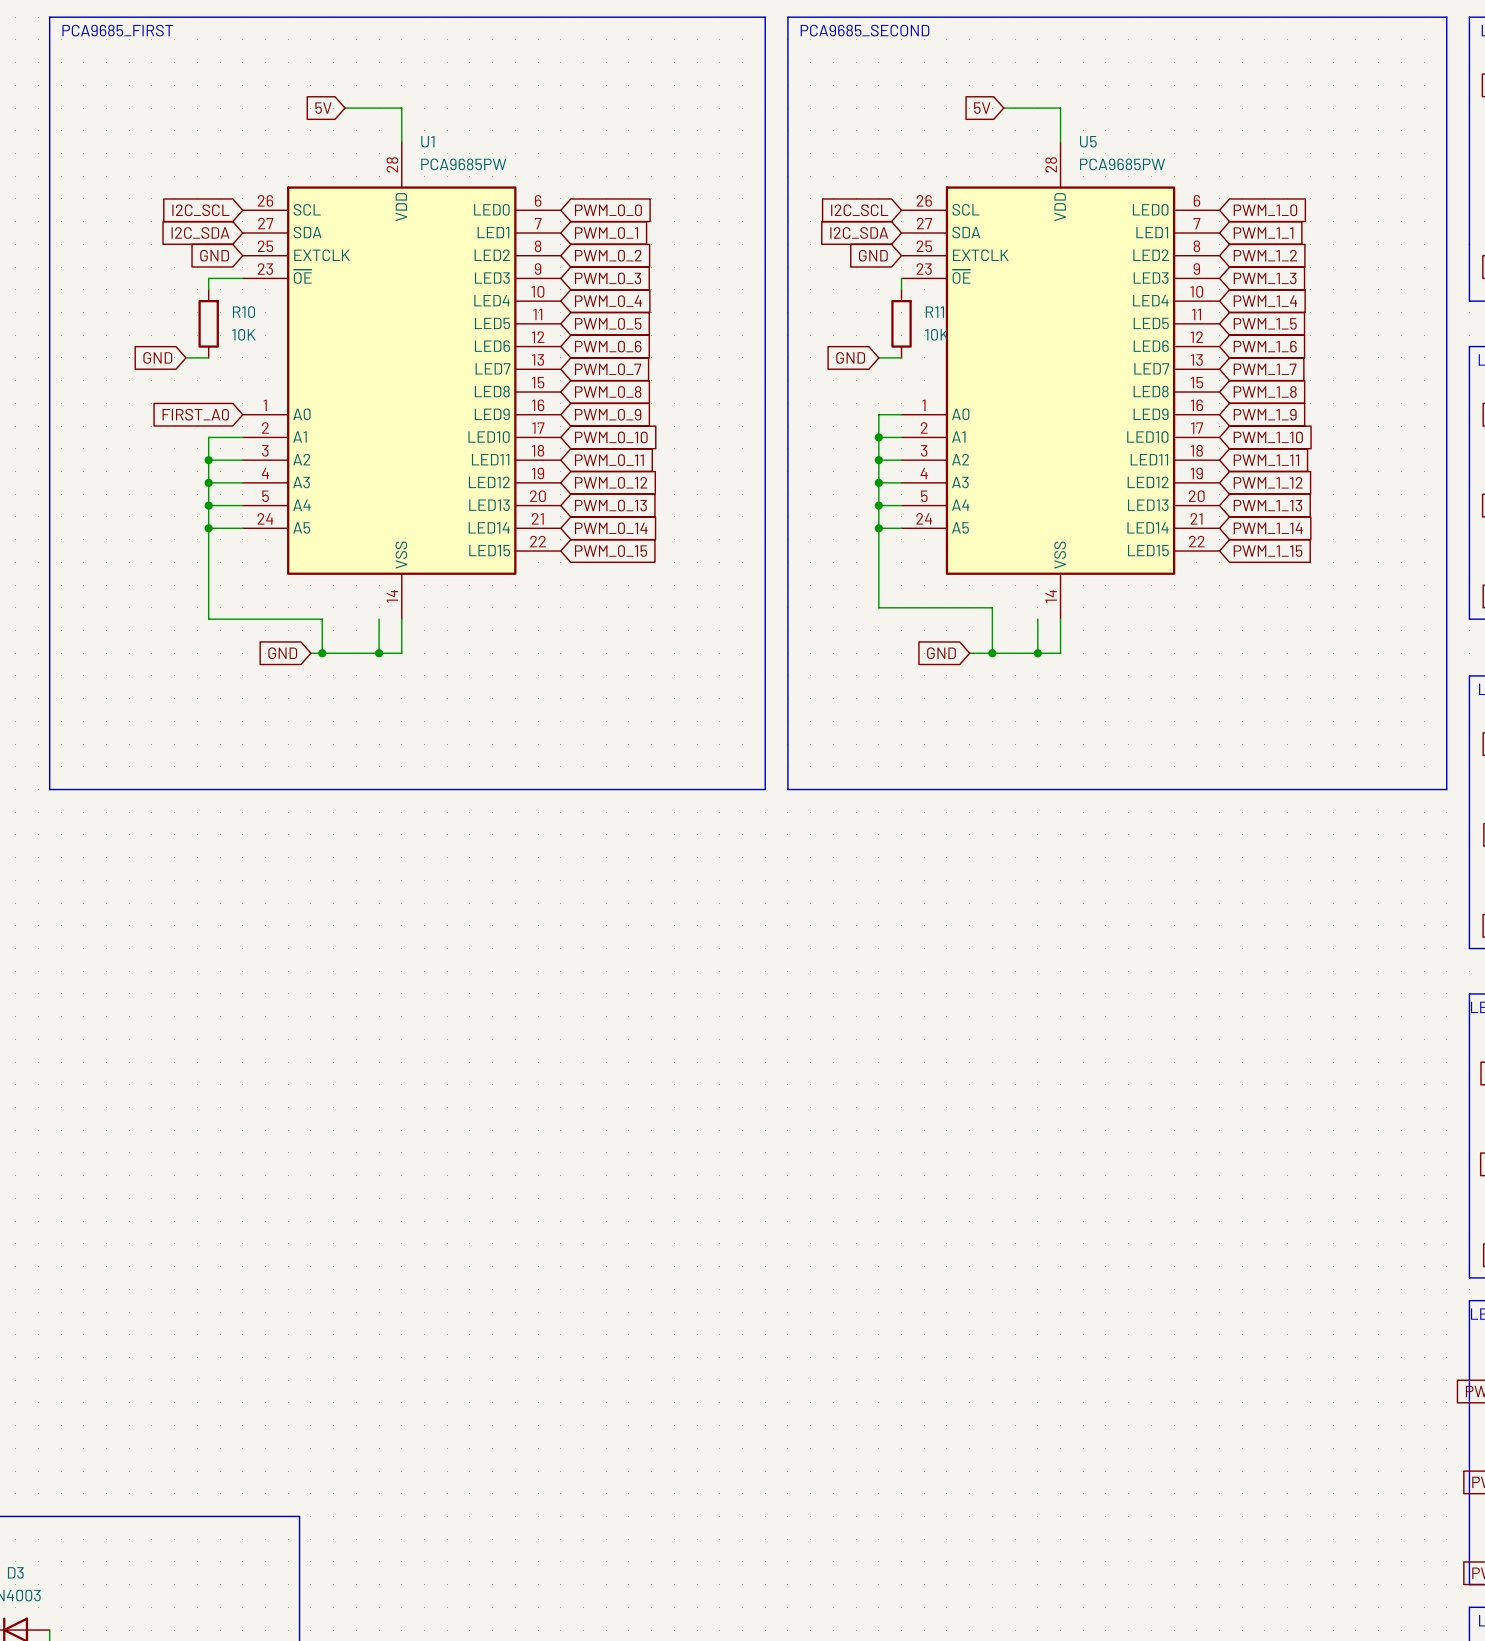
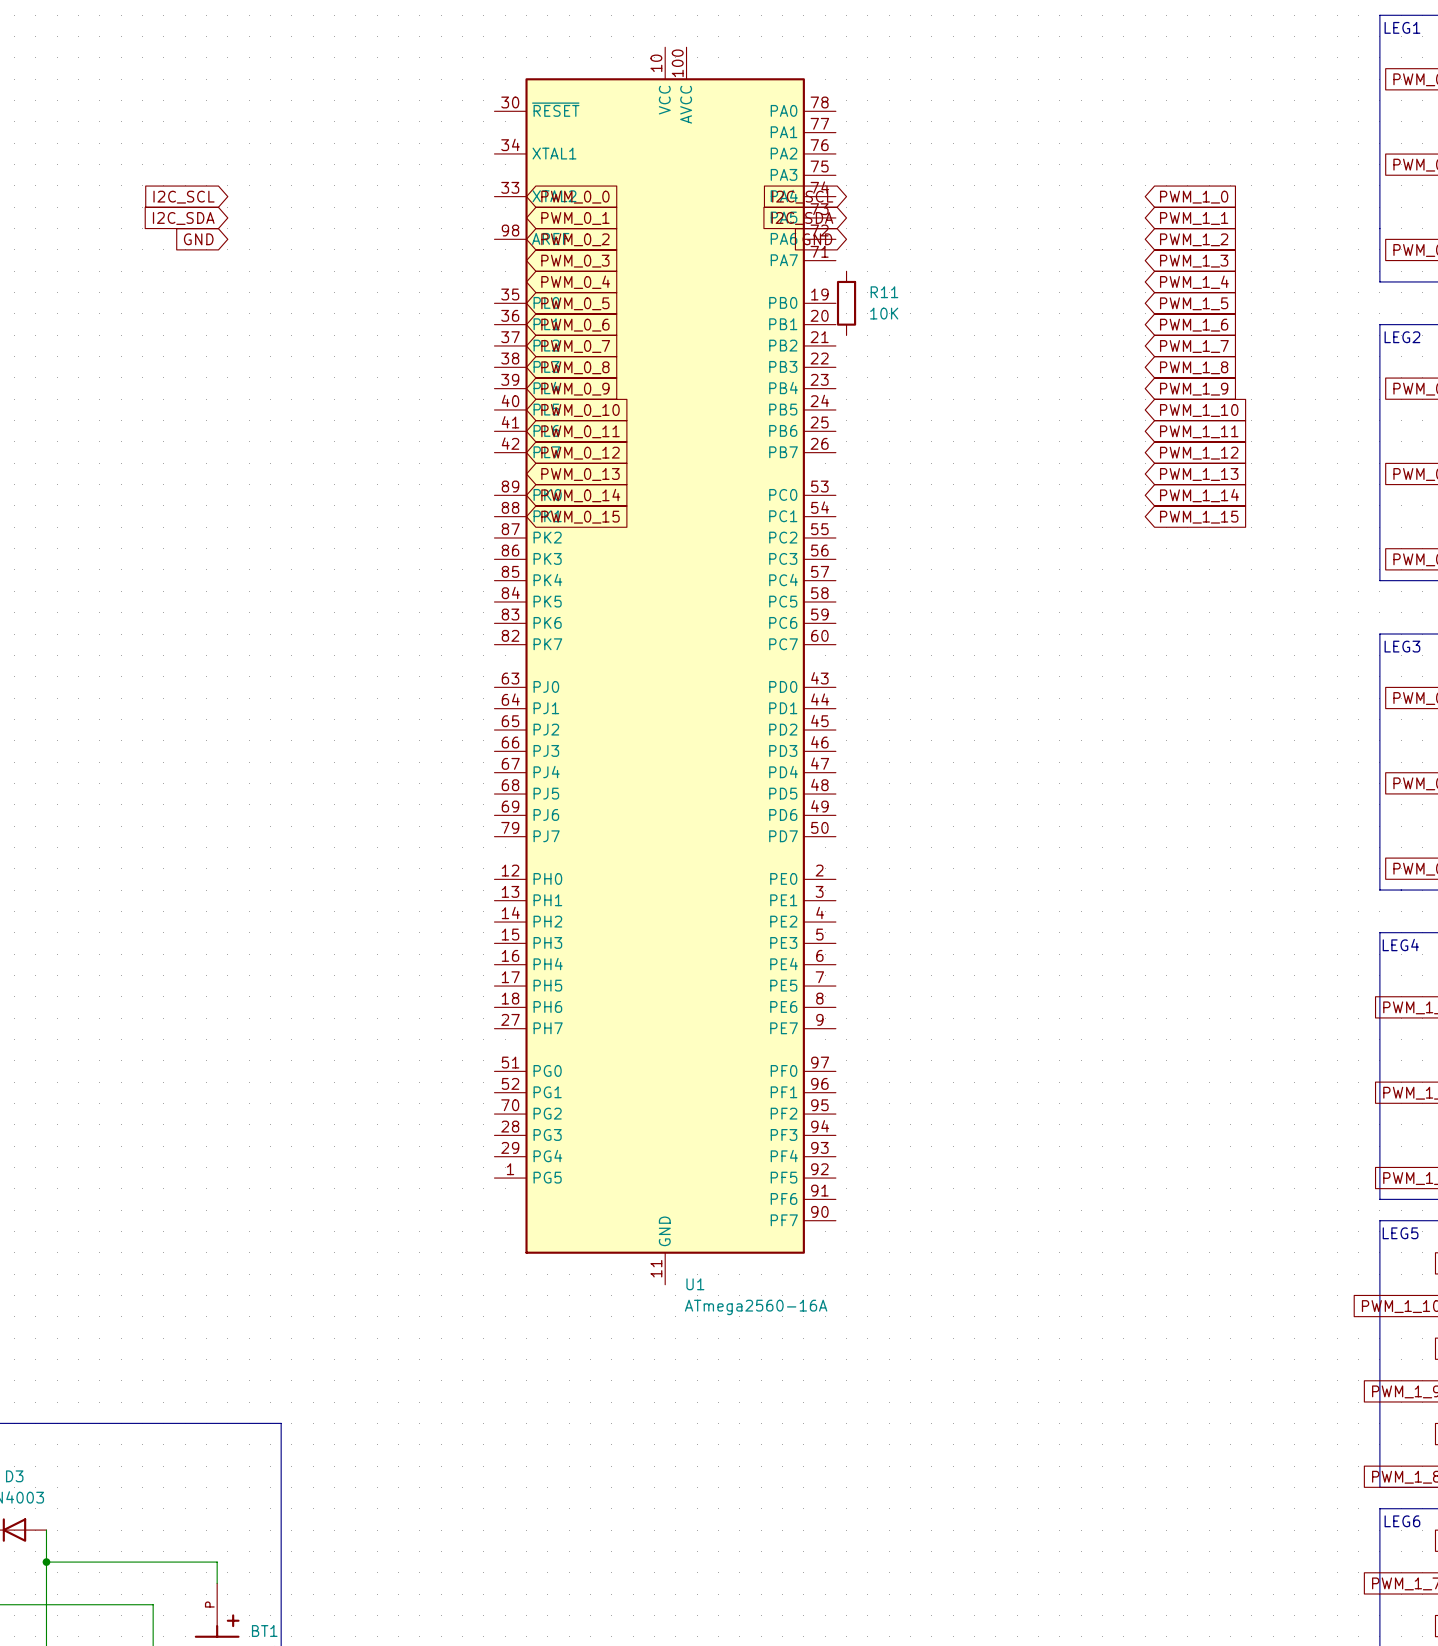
line: (49, 17) (765, 17) (765, 789) (49, 789) (49, 17) -> none
line: (787, 17) (1446, 17) (1446, 789) (787, 789) (787, 17) -> none
text: PCA9685_FIRST (117, 30) -> none
text: PCA9685_SECOND (865, 30) -> none
global label: 5V (323, 108) -> none
wire: (344, 108) (401, 108) (401, 142) -> none
global label: 5V (982, 108) -> none
wire: (1003, 108) (1060, 108) (1060, 142) -> none
U1 name position: U1 (427, 141) -> U1 (695, 1284)
U1 symbol: [242, 142, 561, 620] -> [494, 47, 836, 1285]
U1 value: PCA9685PW (463, 164) -> ATmega2560-16A (756, 1307)
wire: (242, 278) (208, 278) (208, 289) -> none
wire: (901, 278) (901, 289) -> none
R10: 10K (208, 323) -> none
global label: GND (157, 357) -> none
wire: (185, 357) (208, 357) -> none
global label: GND (850, 357) -> none
wire: (878, 357) (901, 357) -> none
U5: PCA9685PW (1060, 380) -> none
global label: FIRST_A0 (195, 414) -> none
wire: (901, 414) (878, 414) (878, 607) (992, 607) (992, 653) -> none
wire: (242, 437) (208, 437) (208, 619) (322, 619) (322, 653) -> none
wire: (878, 437) (901, 437) -> none
junction: (878, 437) -> none
wire: (208, 460) (242, 460) -> none
junction: (208, 460) -> none
wire: (878, 460) (901, 460) -> none
junction: (878, 460) -> none
wire: (208, 482) (242, 482) -> none
junction: (208, 482) -> none
wire: (878, 482) (901, 482) -> none
junction: (878, 482) -> none
wire: (208, 505) (242, 505) -> none
junction: (208, 505) -> none
wire: (878, 505) (901, 505) -> none
junction: (878, 505) -> none
wire: (208, 528) (242, 528) -> none
junction: (208, 528) -> none
wire: (878, 528) (901, 528) -> none
junction: (878, 528) -> none
wire: (379, 619) (379, 653) -> none
wire: (401, 619) (401, 653) (310, 653) -> none
wire: (1037, 619) (1037, 653) -> none
wire: (1060, 619) (1060, 653) (969, 653) -> none
global label: GND (282, 653) -> none
junction: (322, 653) -> none
junction: (379, 653) -> none
global label: GND (941, 653) -> none
junction: (992, 653) -> none
junction: (1037, 653) -> none

